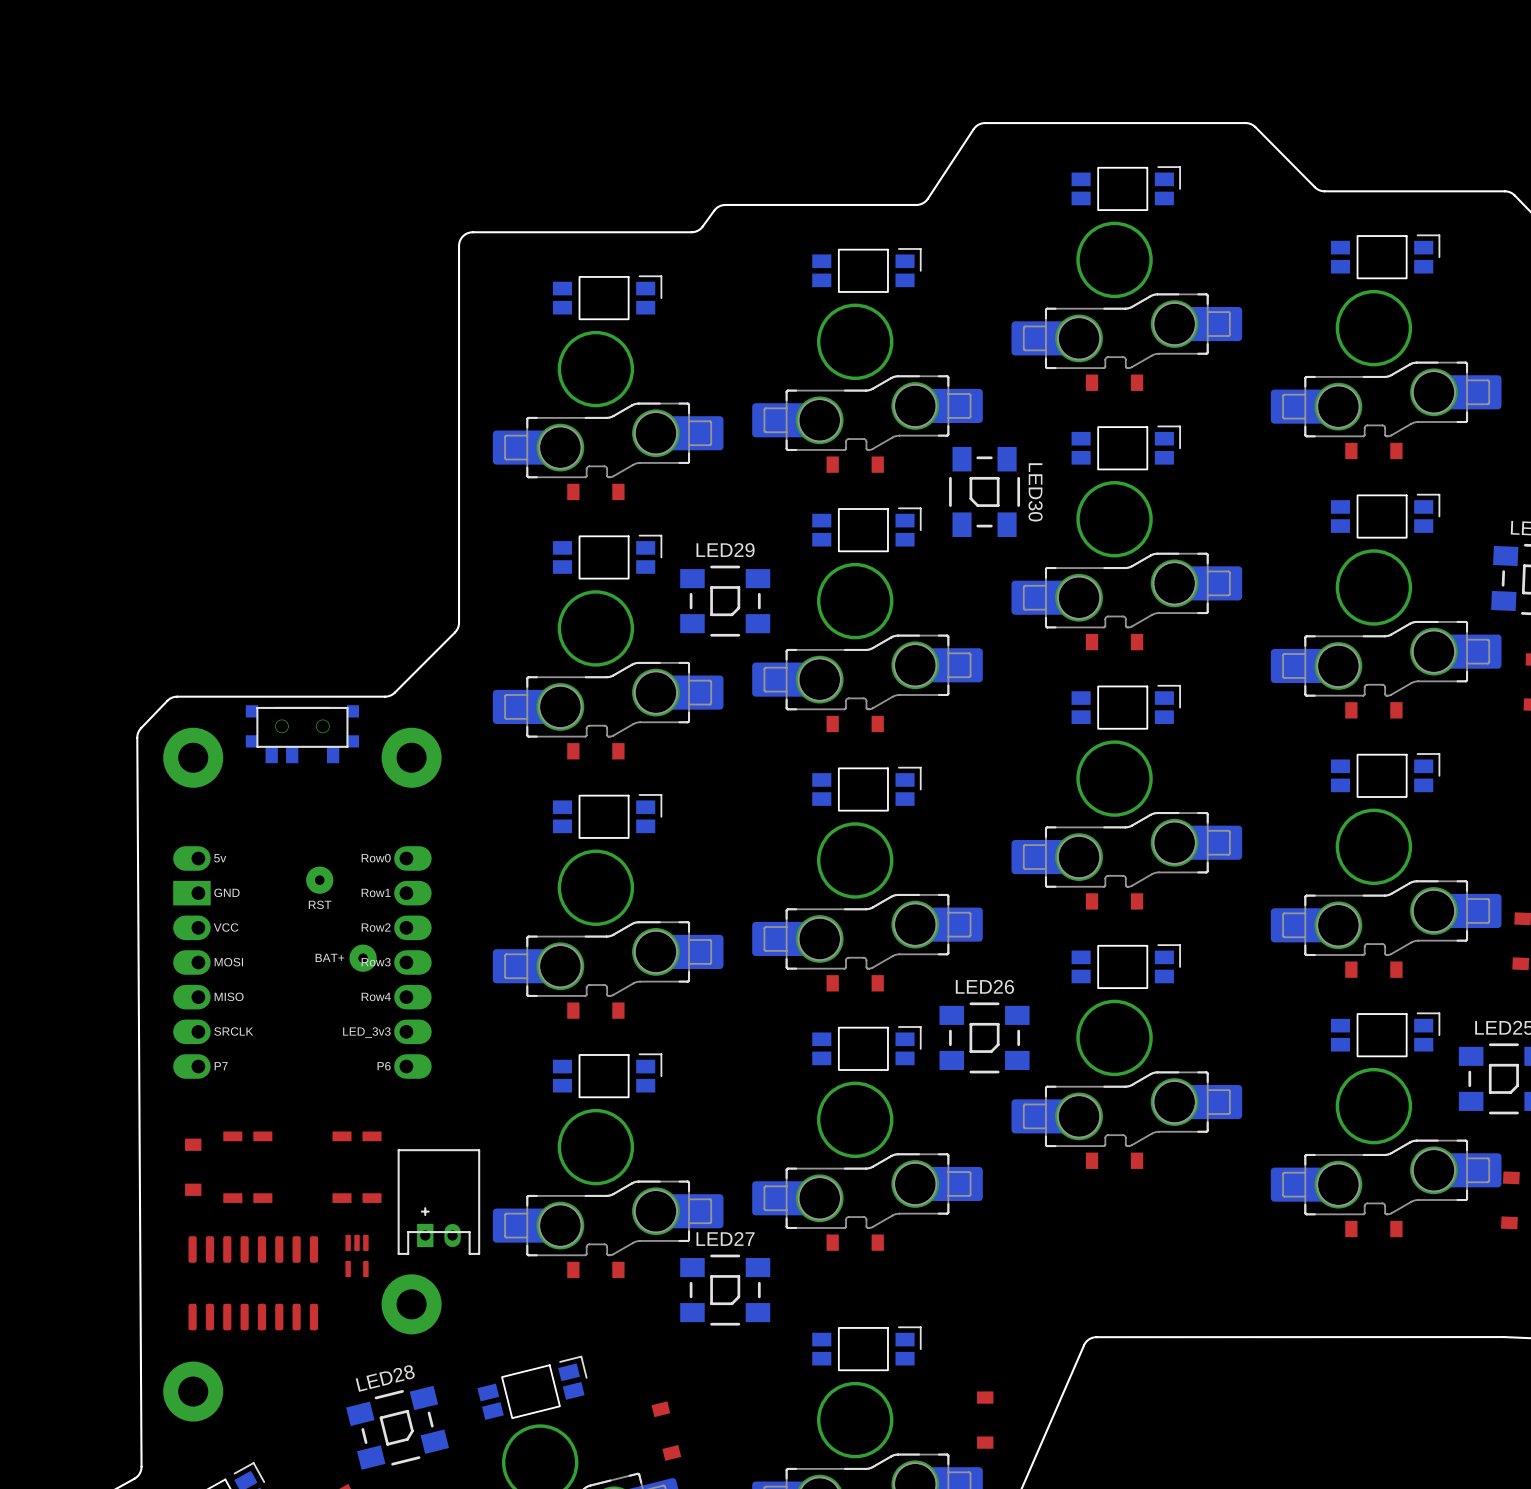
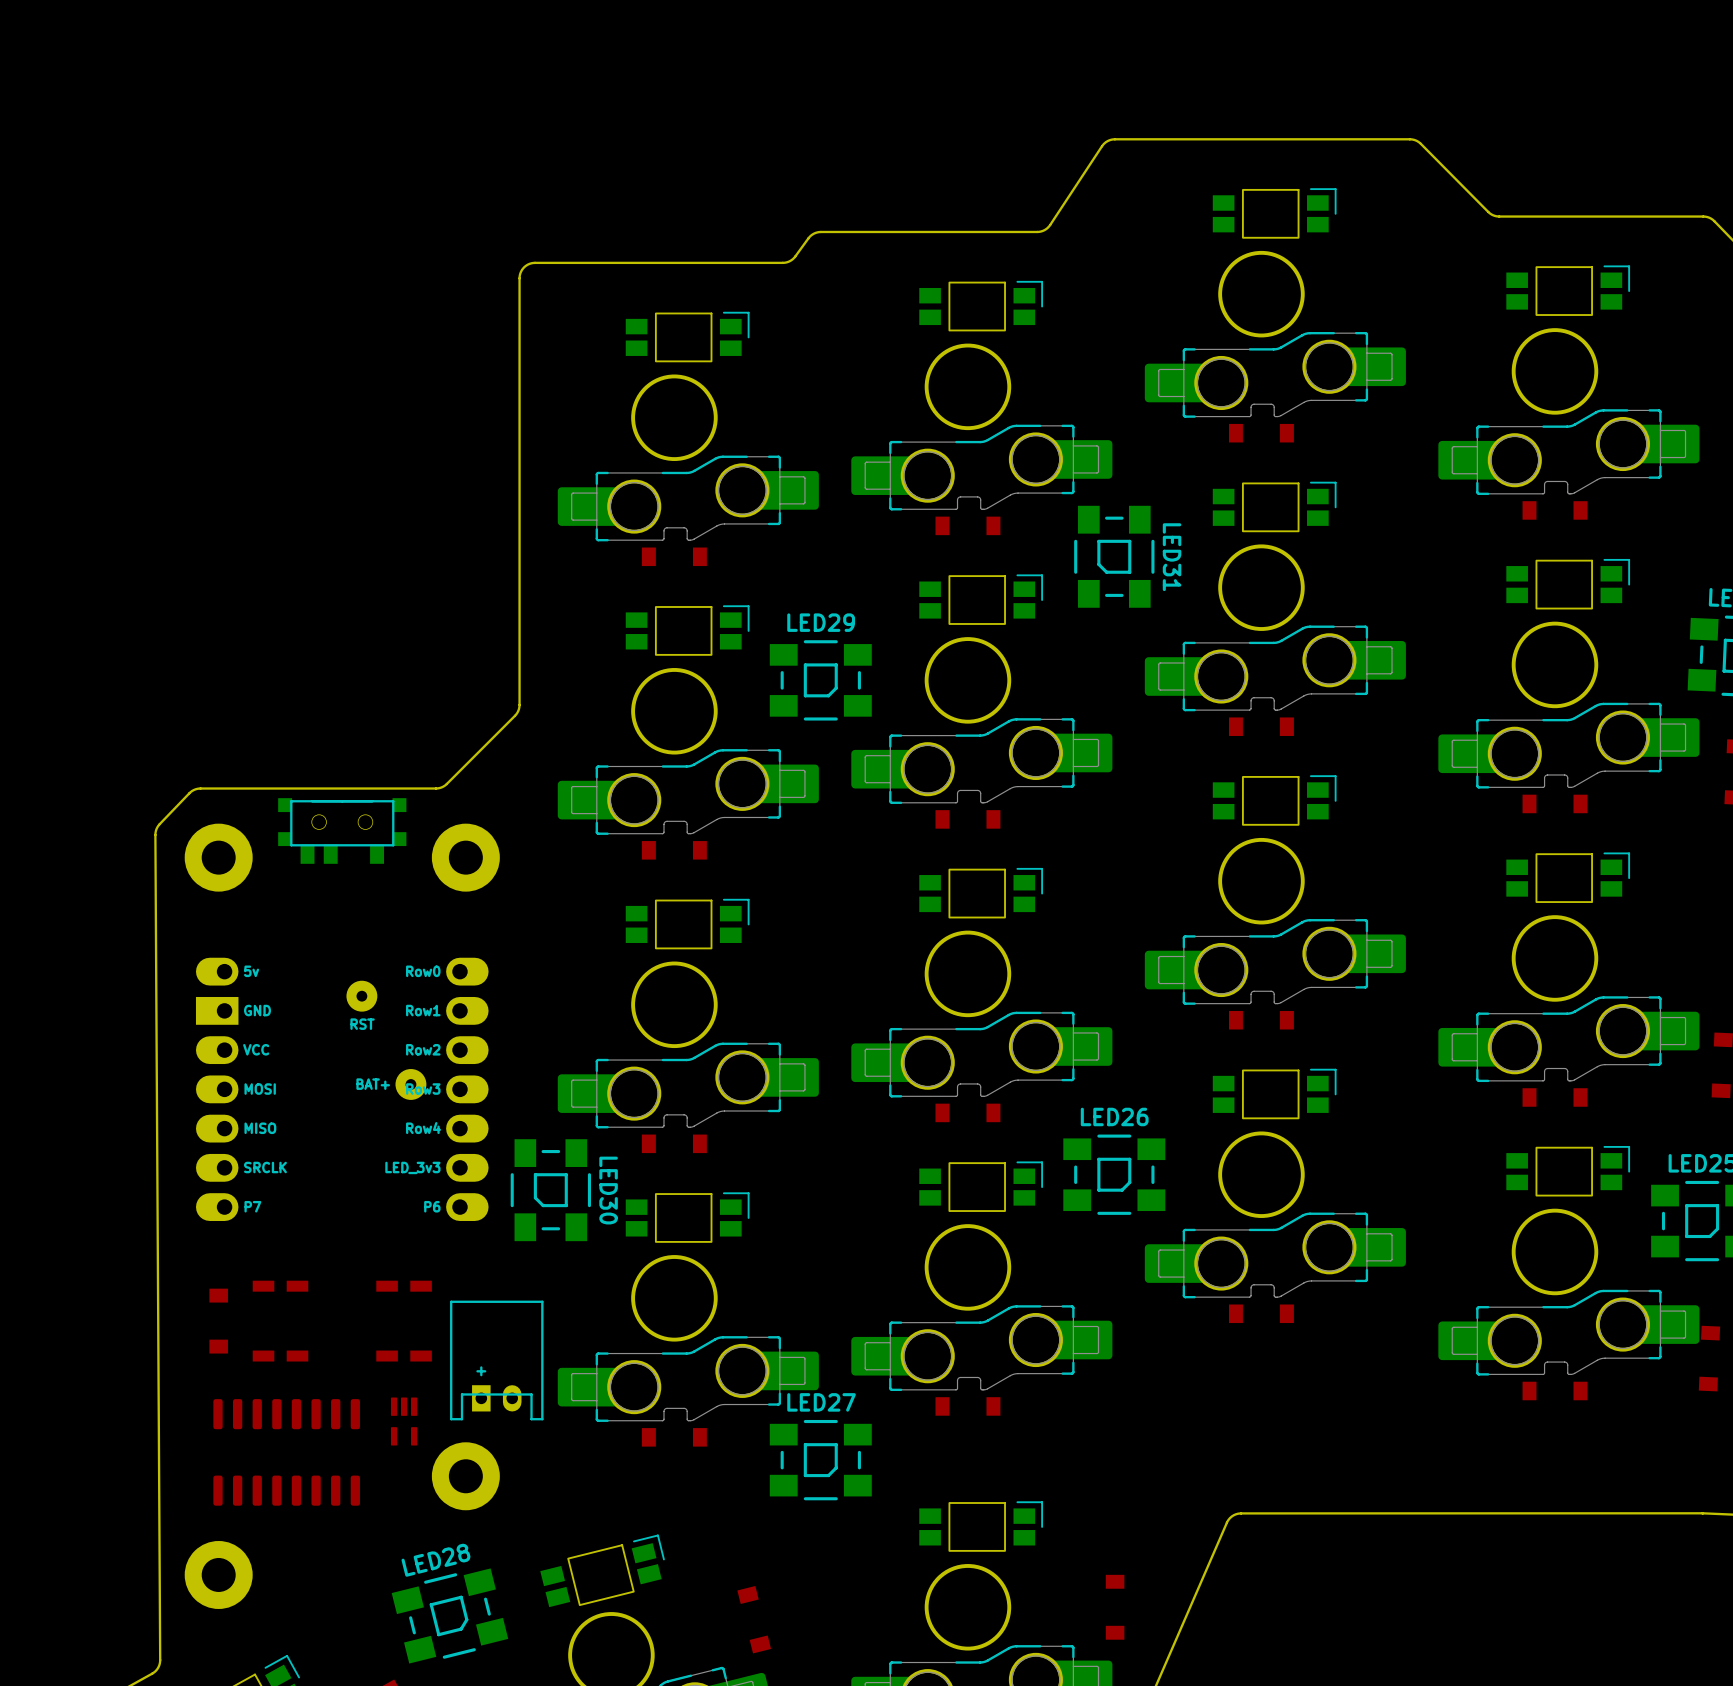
LED30 name: LED30 (1035, 492) -> LED31 (1172, 557)
LED30: none -> (550, 1190)

